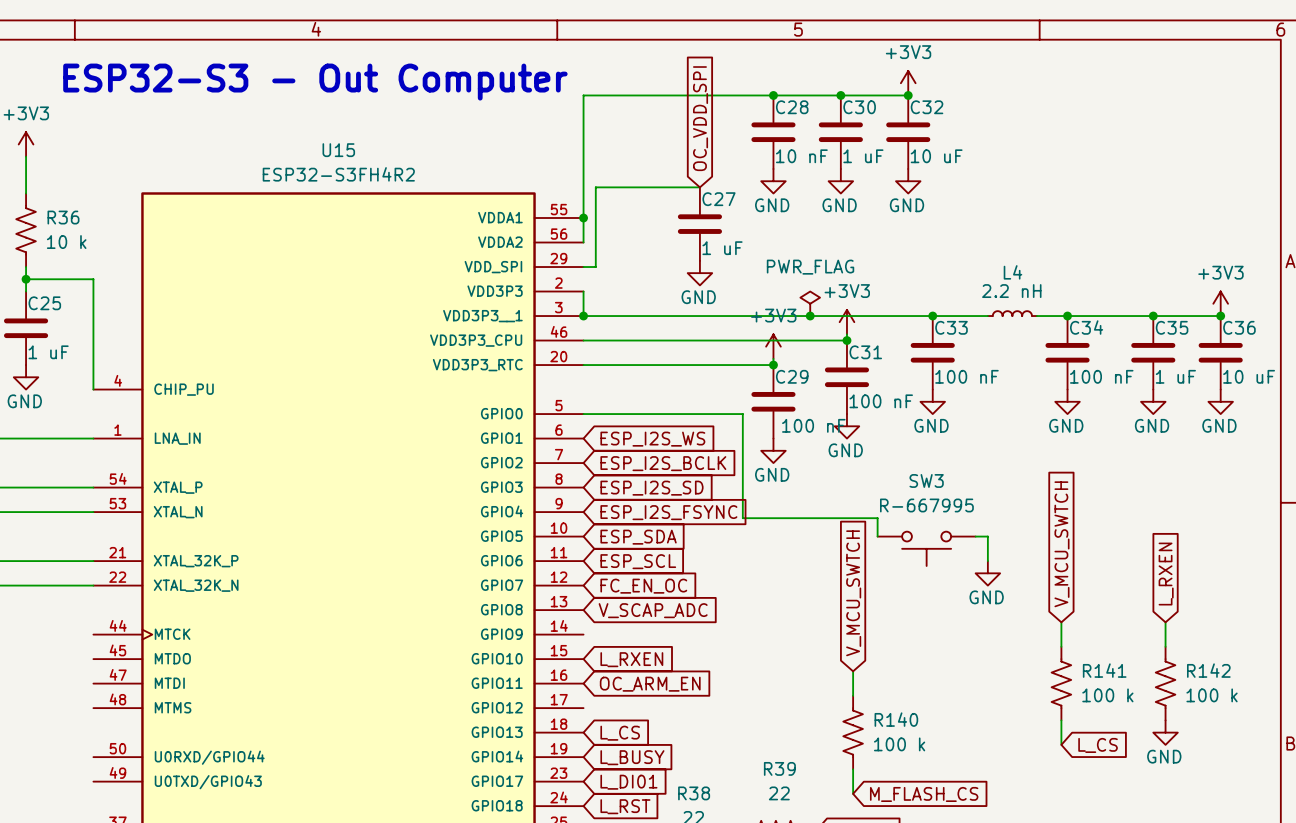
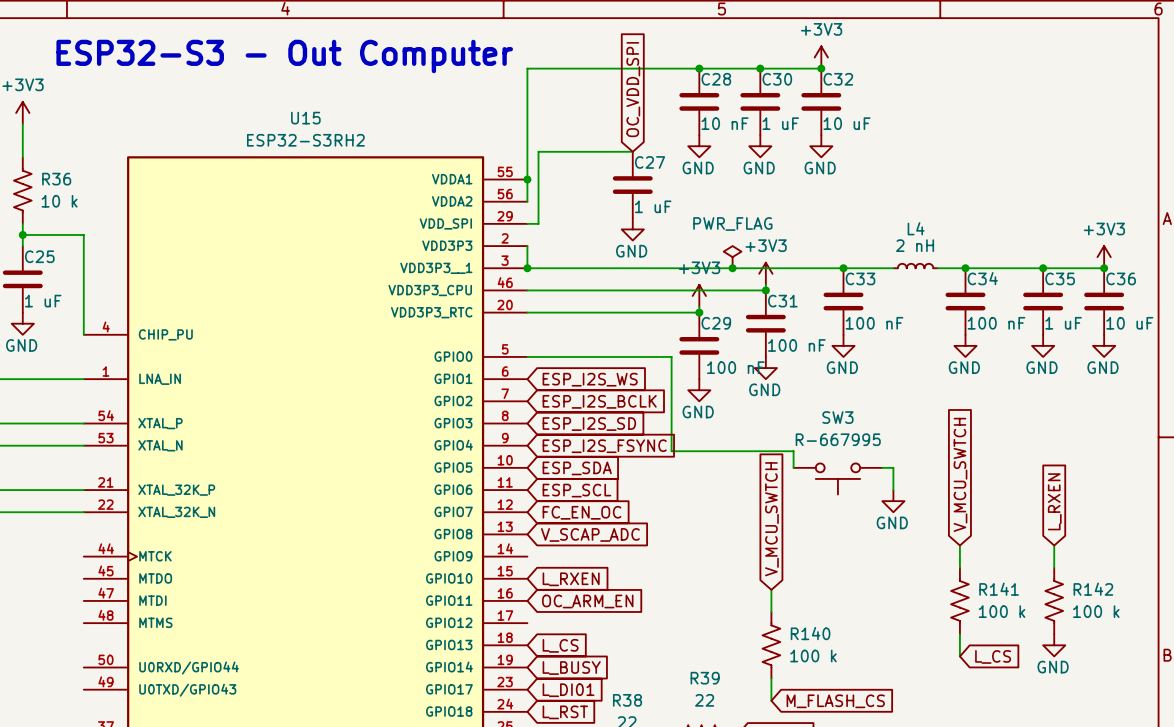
U15 value: ESP32-S3FH4R2 (338, 174) -> ESP32-S3RH2 (305, 140)
L4 value: 2.2 nH (1011, 291) -> 2 nH (915, 245)

